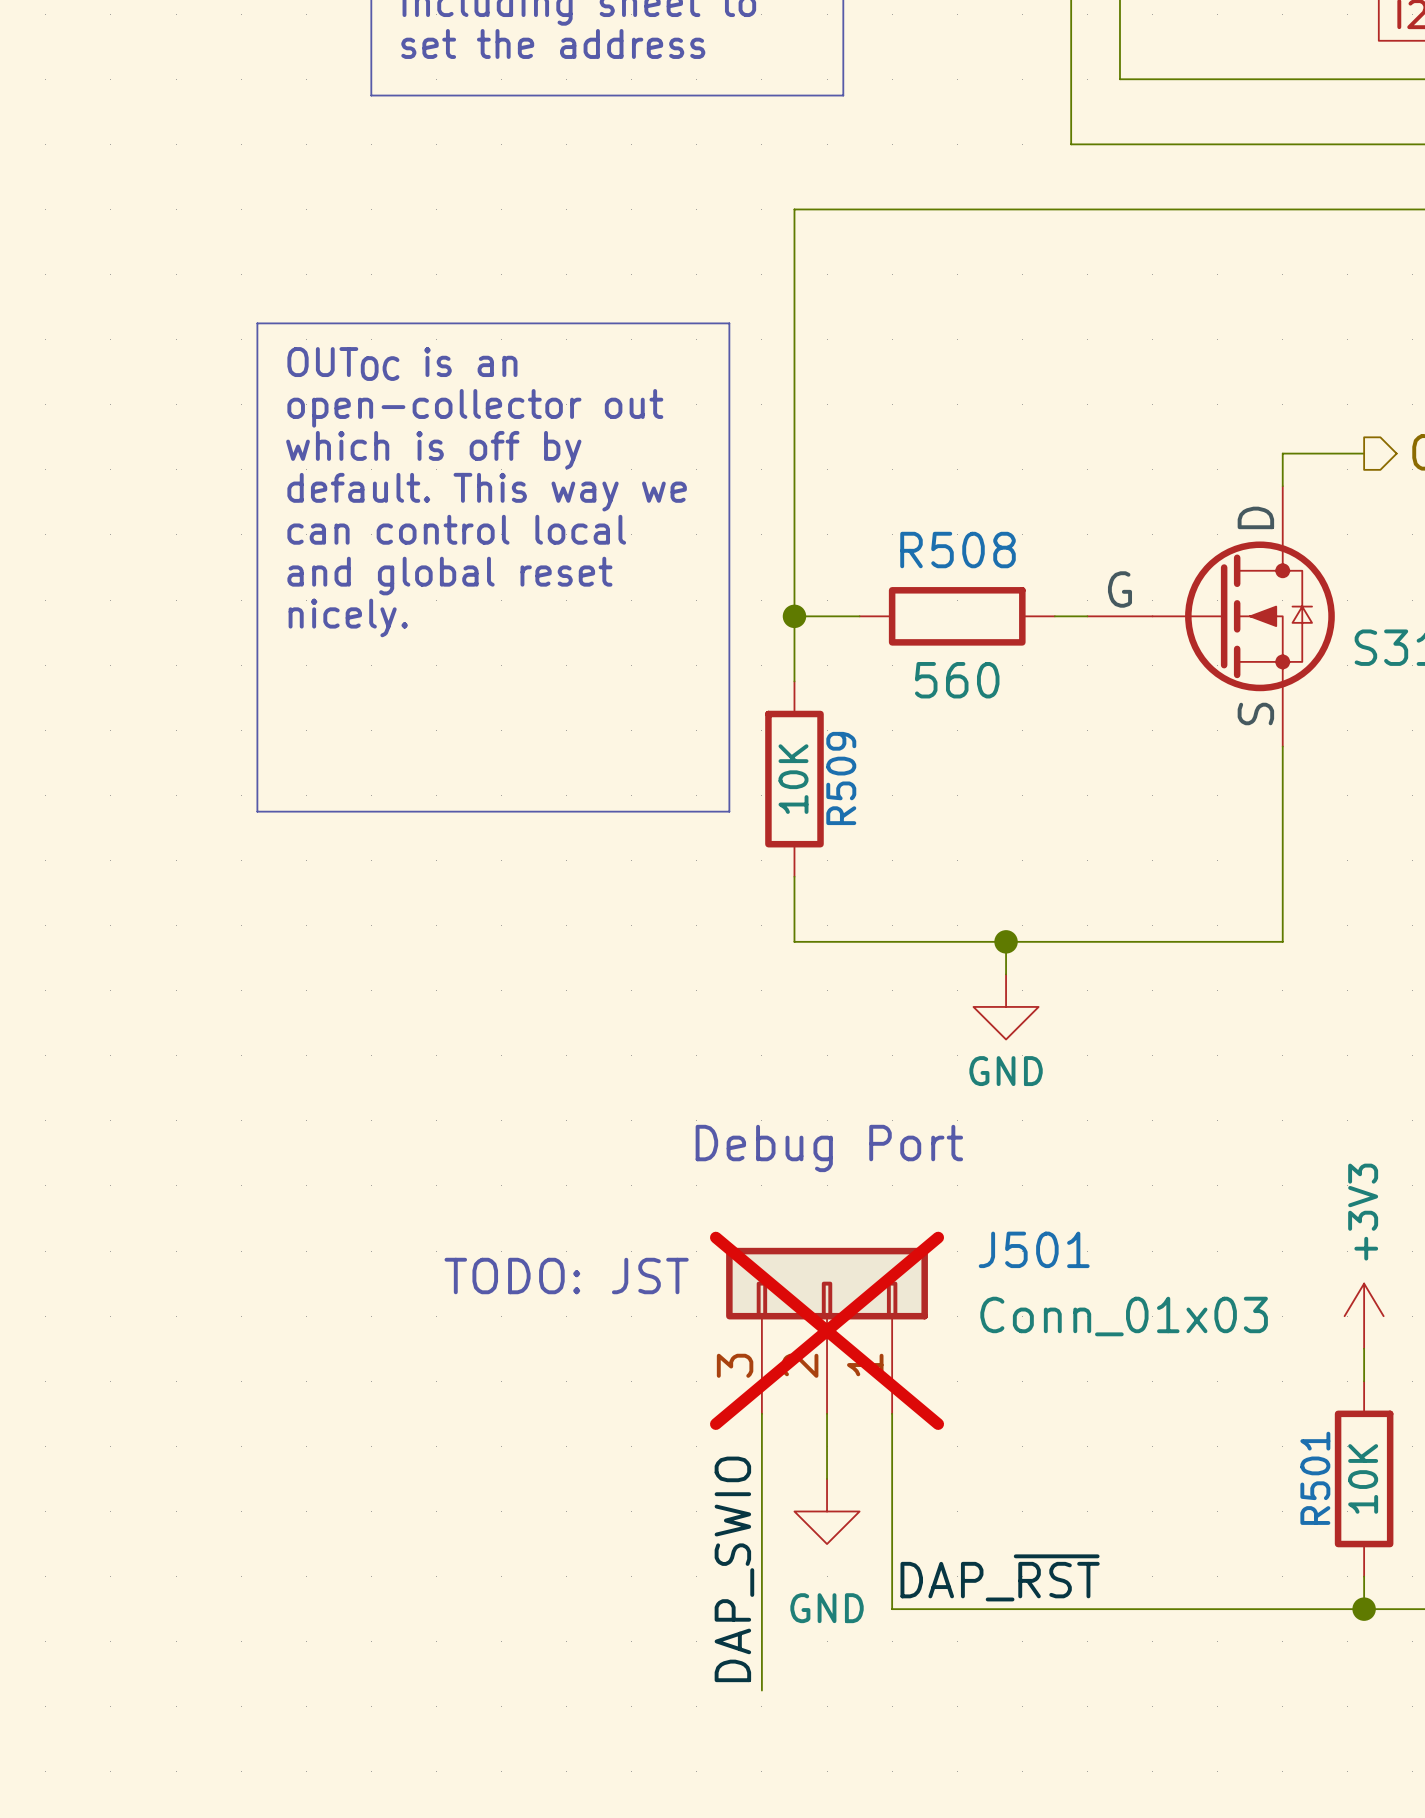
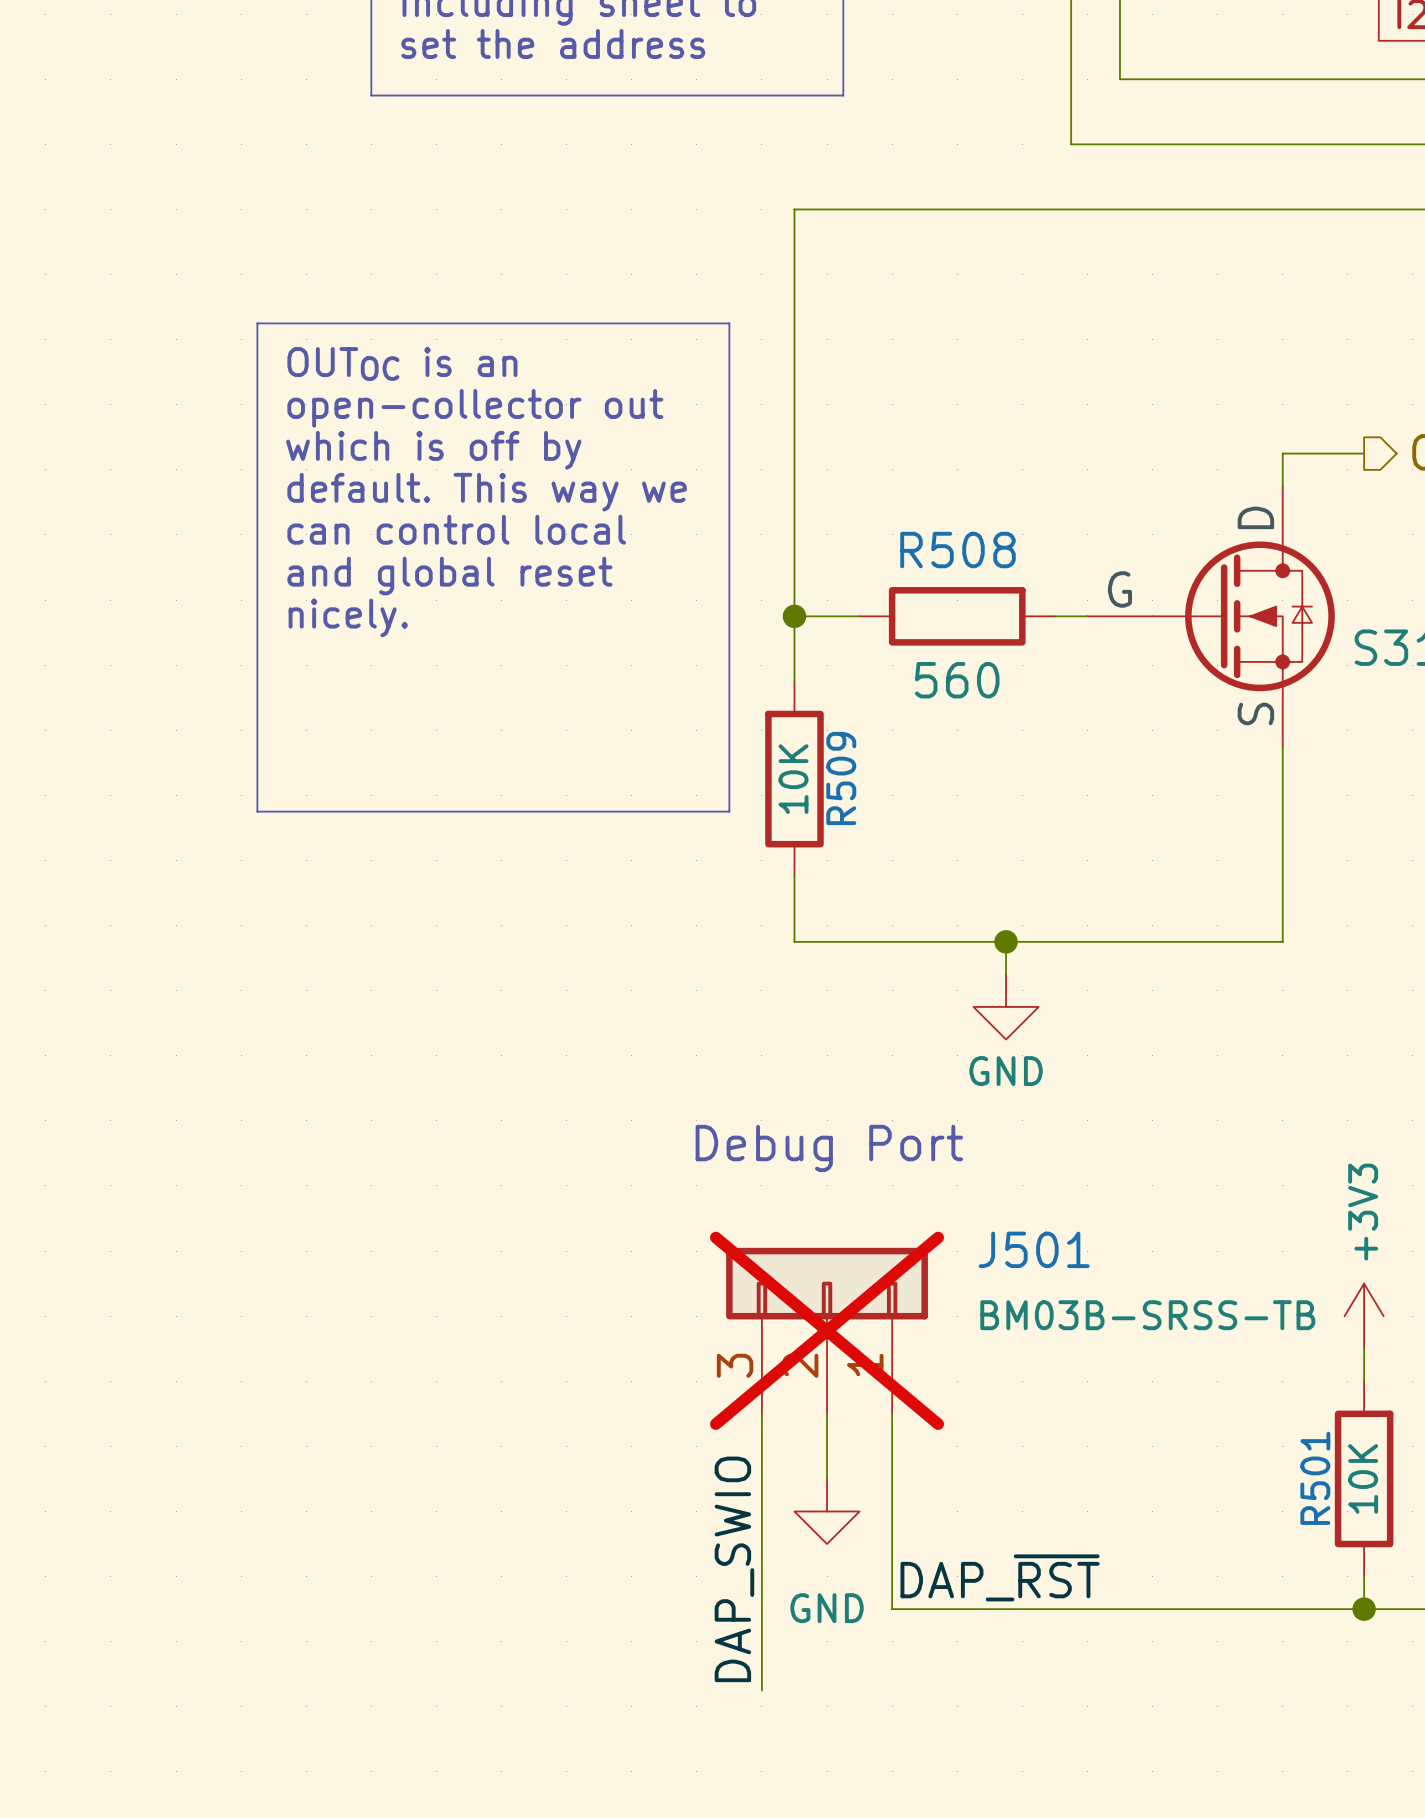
text: TODO: JST (566, 1276) -> none
J501 value: Conn_01x03 (1124, 1316) -> BM03B-SRSS-TB (1147, 1315)

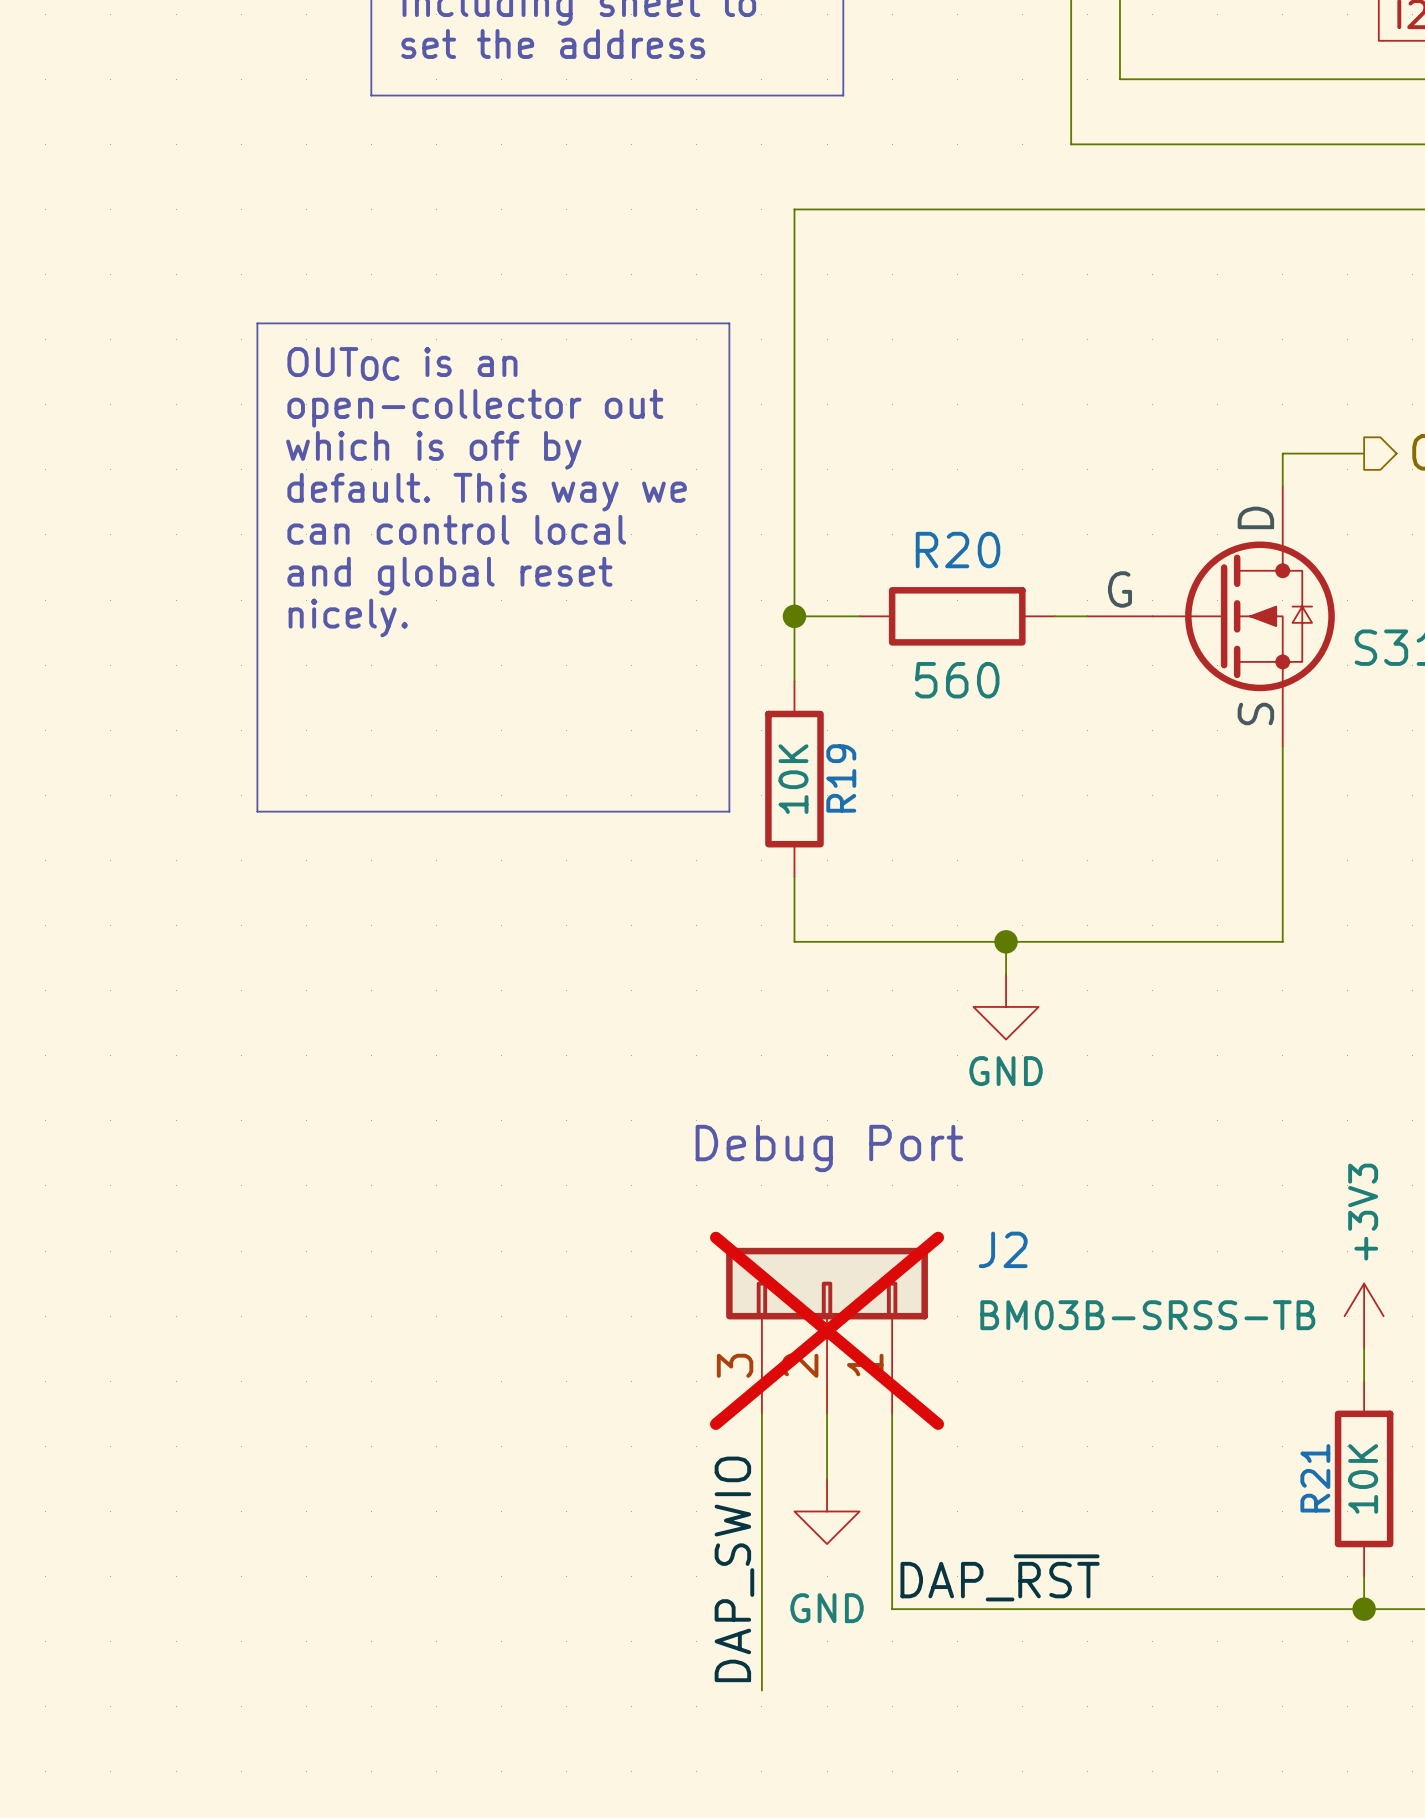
R508 name: R508 (958, 550) -> R20 (958, 550)
R509 name: R509 (841, 778) -> R19 (841, 778)
J501 name: J501 (1034, 1249) -> J2 (1003, 1249)
R501 name: R501 (1315, 1478) -> R21 (1315, 1478)

